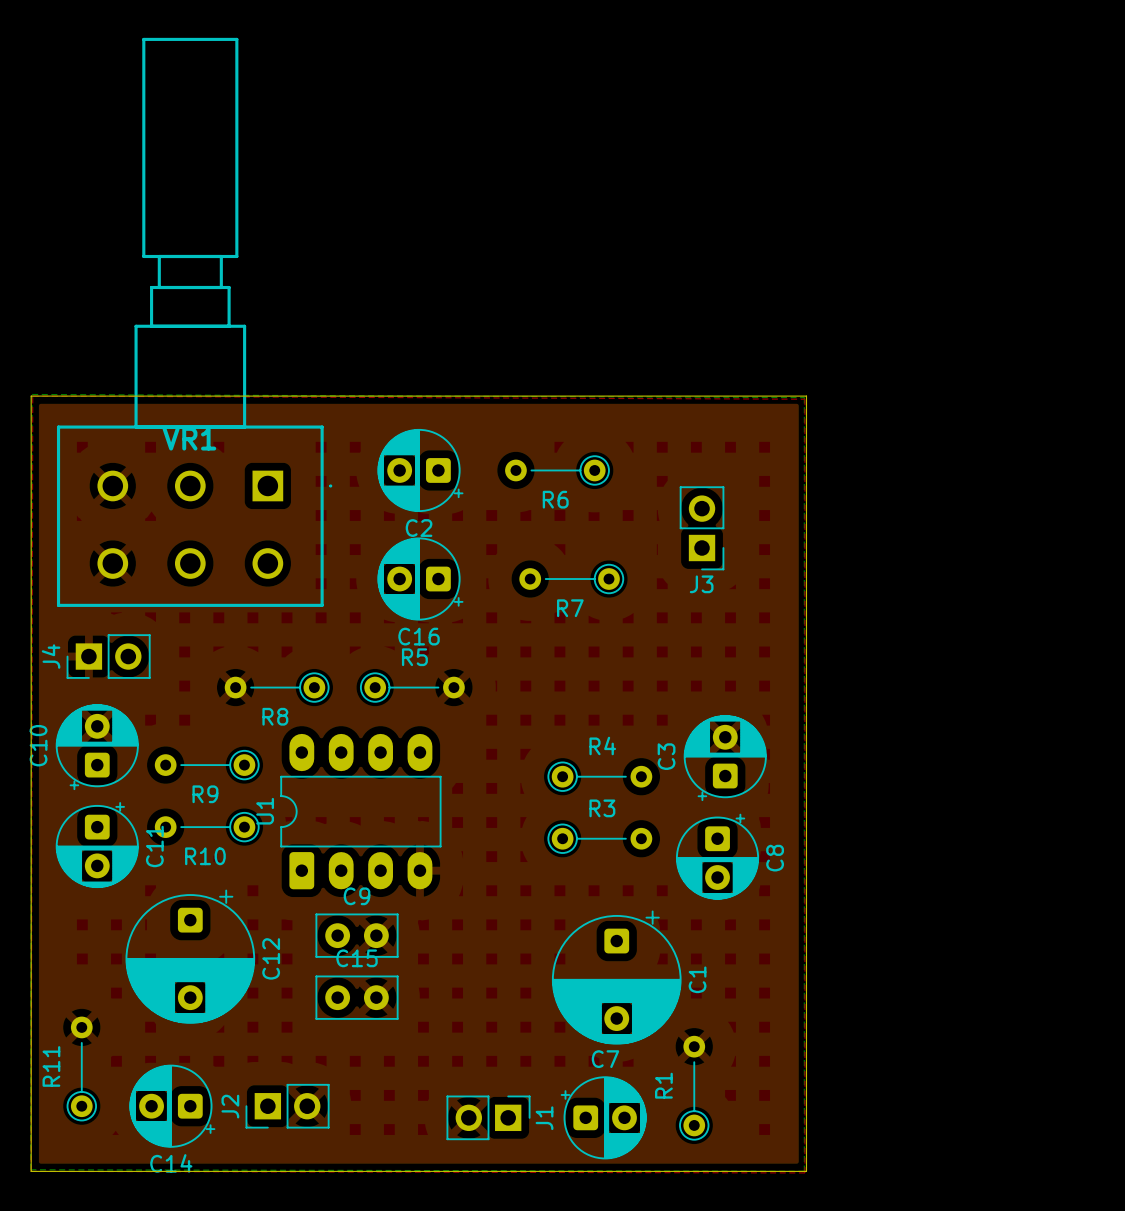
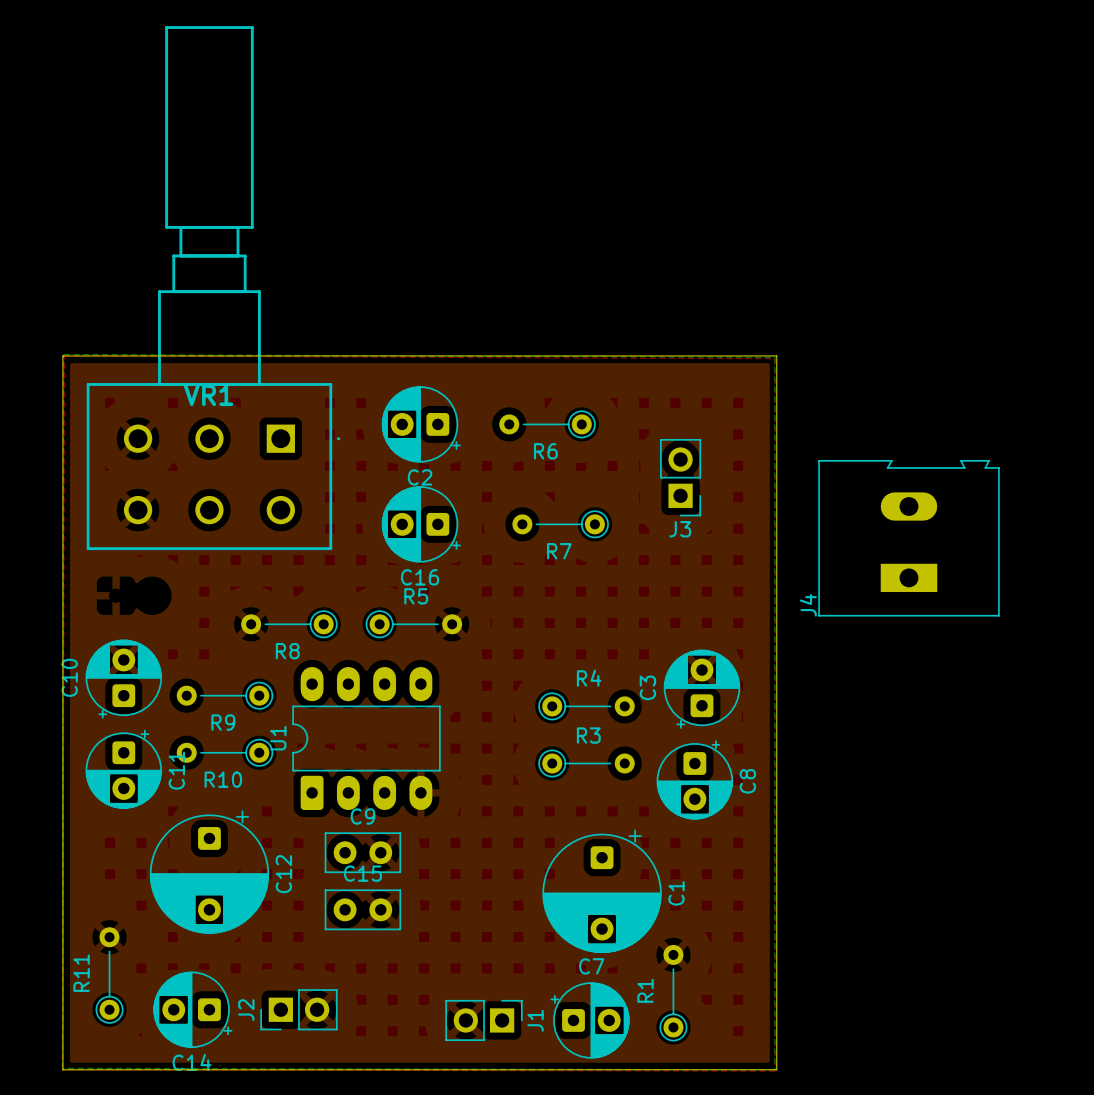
J4 footprint: [66, 634, 151, 679] -> [818, 459, 1000, 617]
J4 name position: J4 (51, 656) -> J4 (808, 605)

